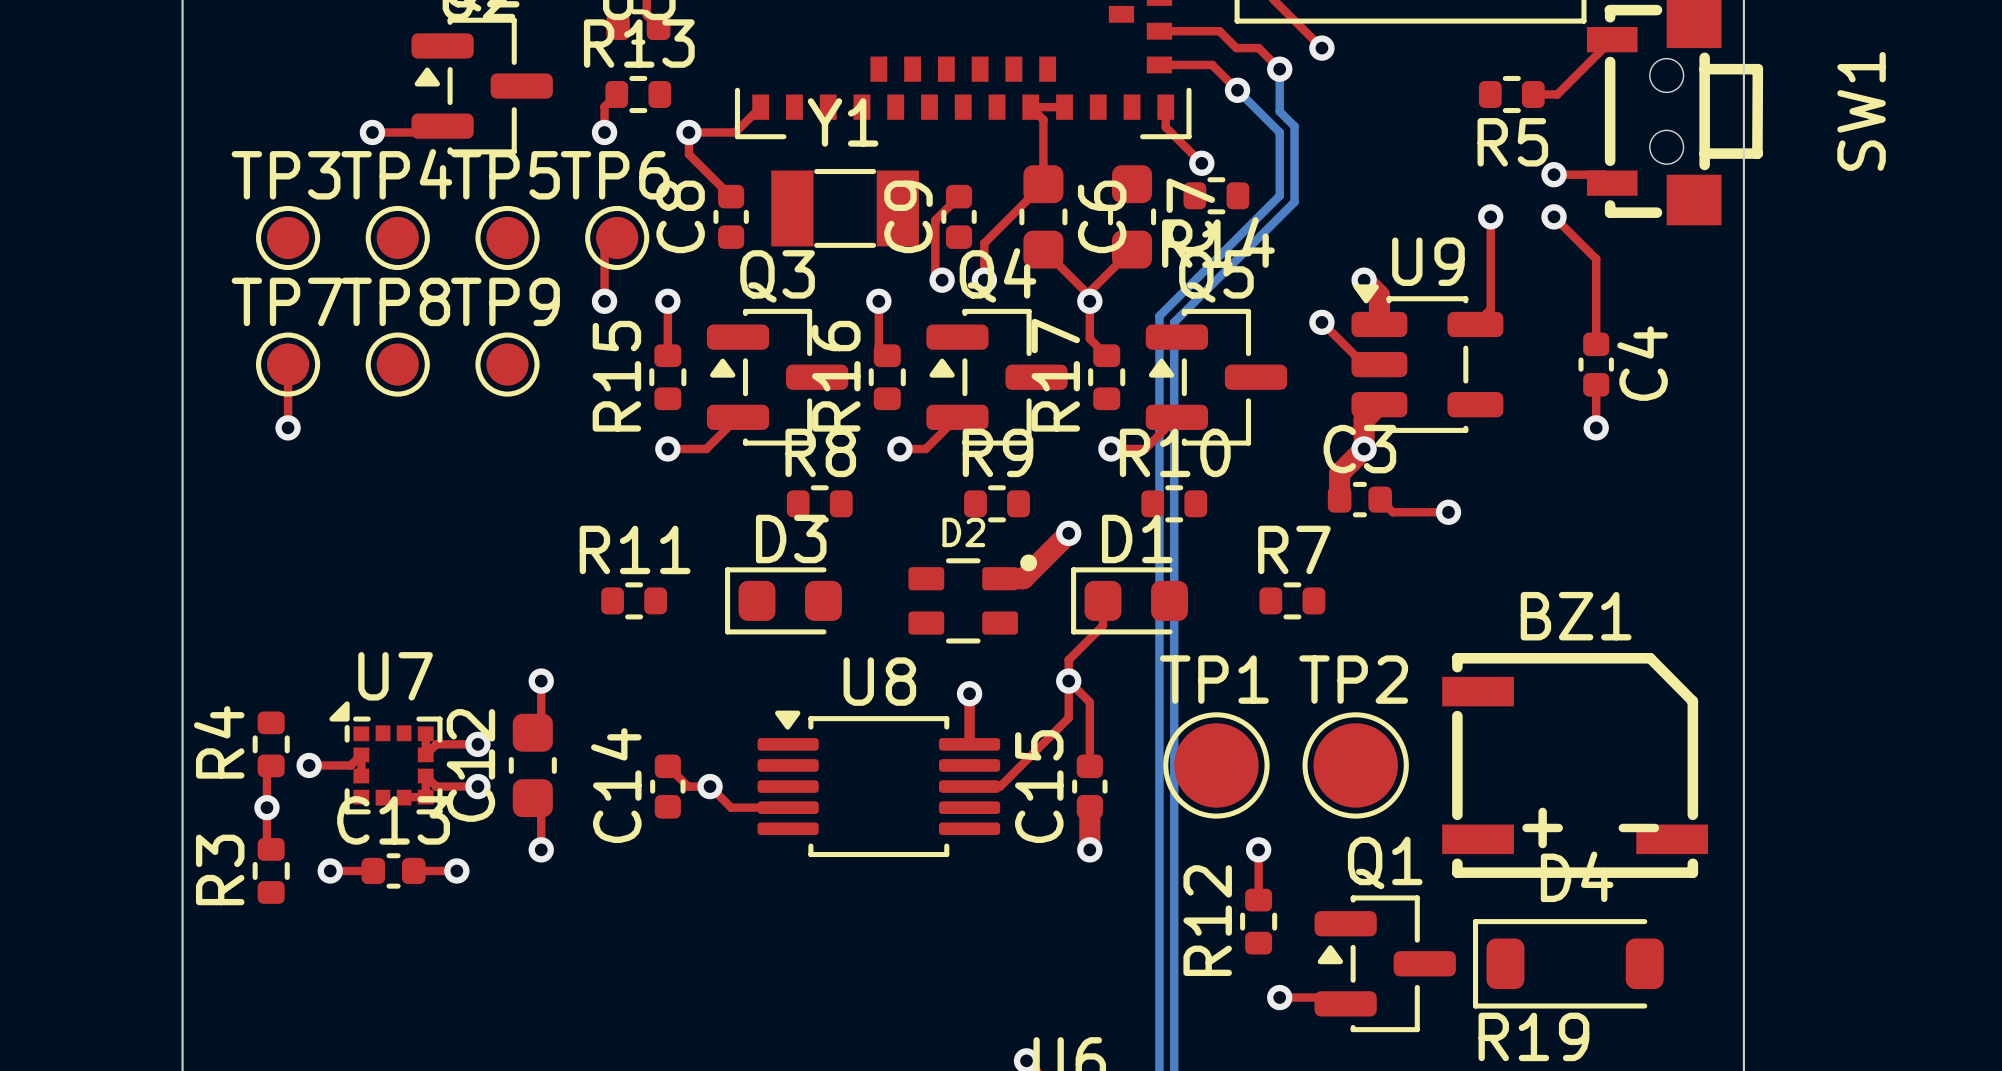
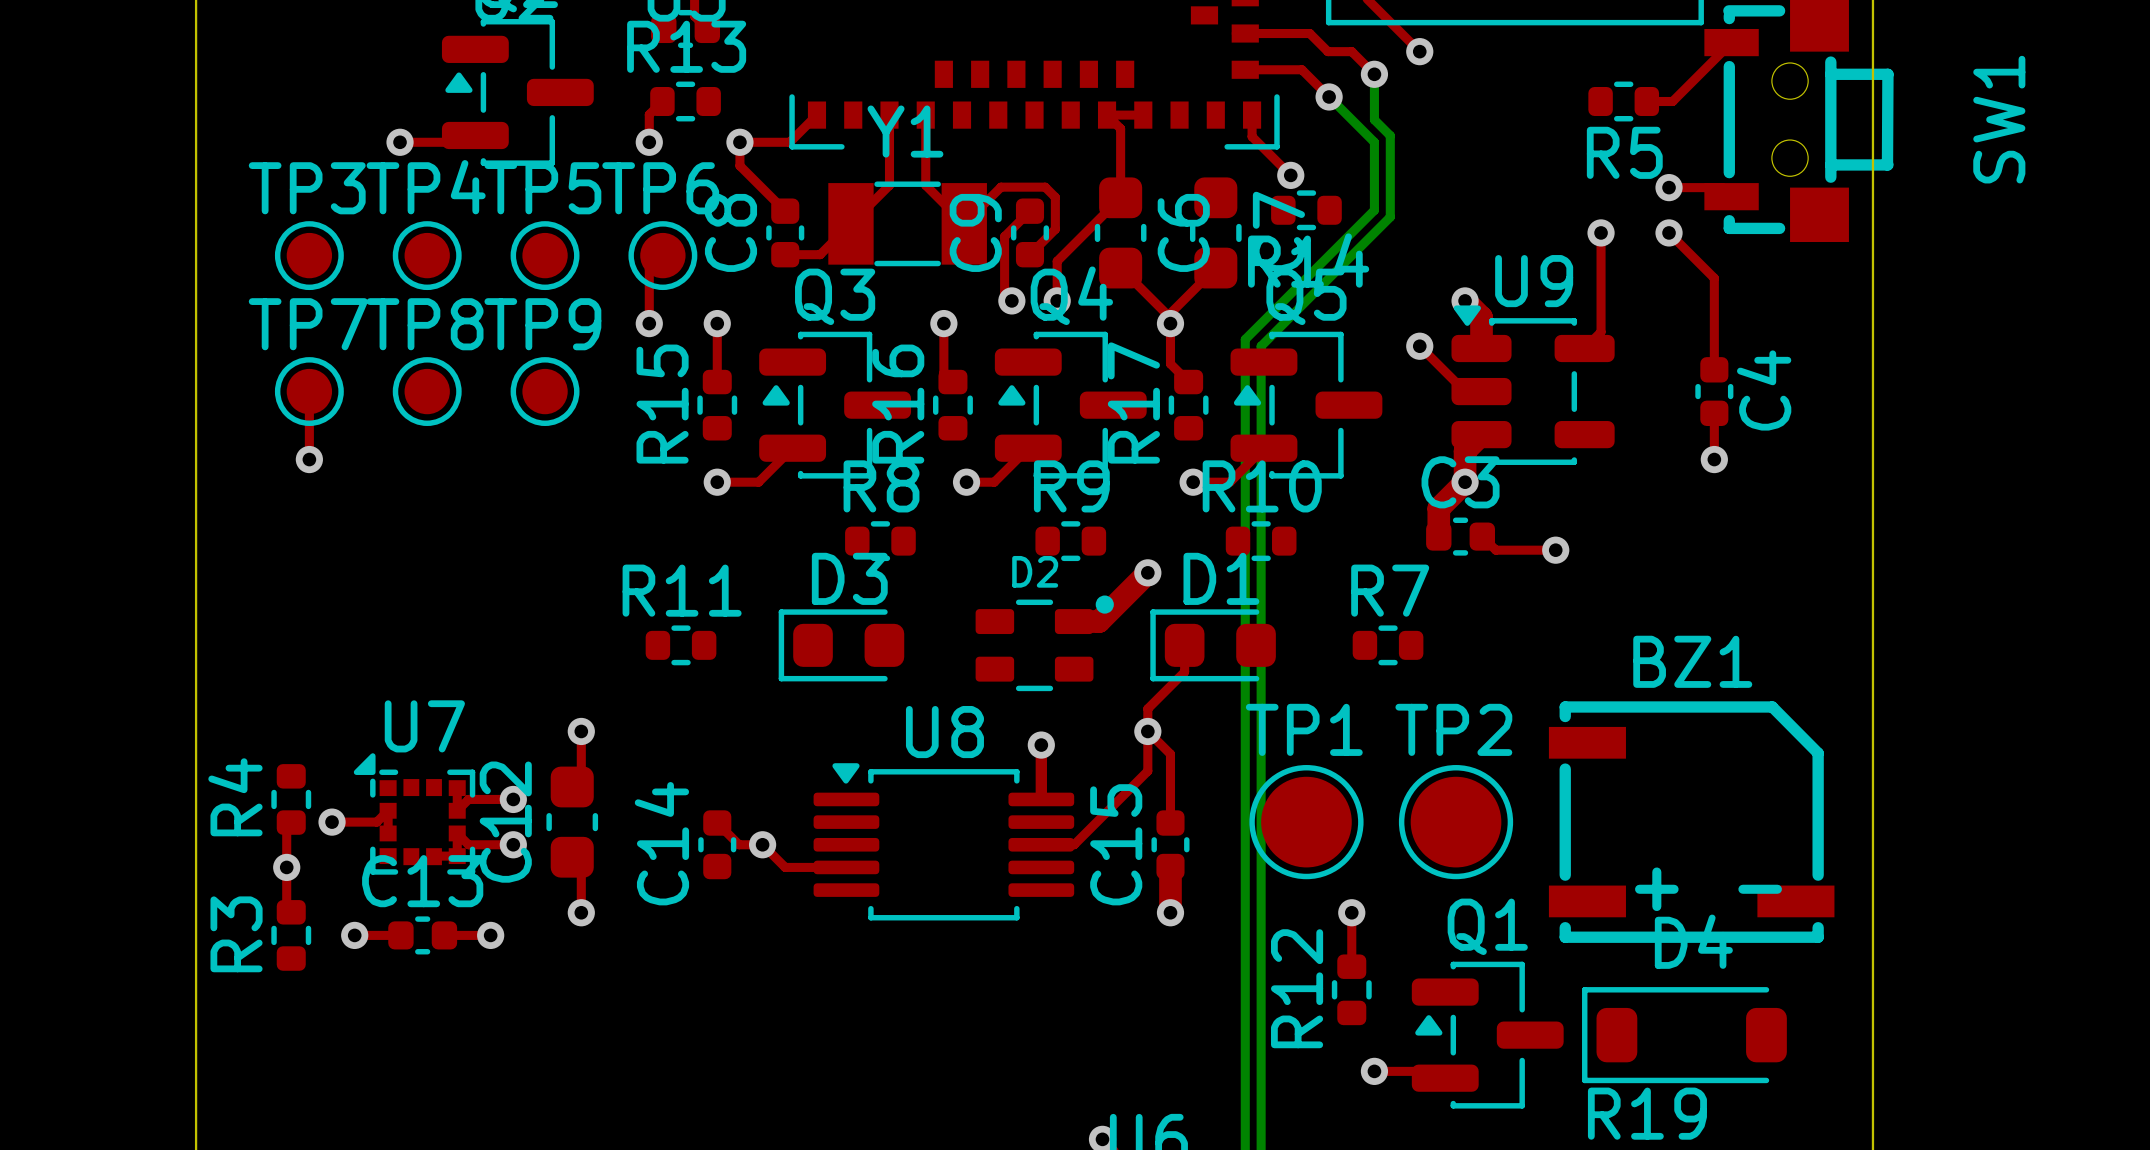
top track: none -> (889, 115) (889, 185) (820, 254) (785, 254)
top track: none -> (925, 115) (925, 185) (964, 223) (1000, 187) (1045, 187) (1055, 197) (1055, 229) (1029, 254)

